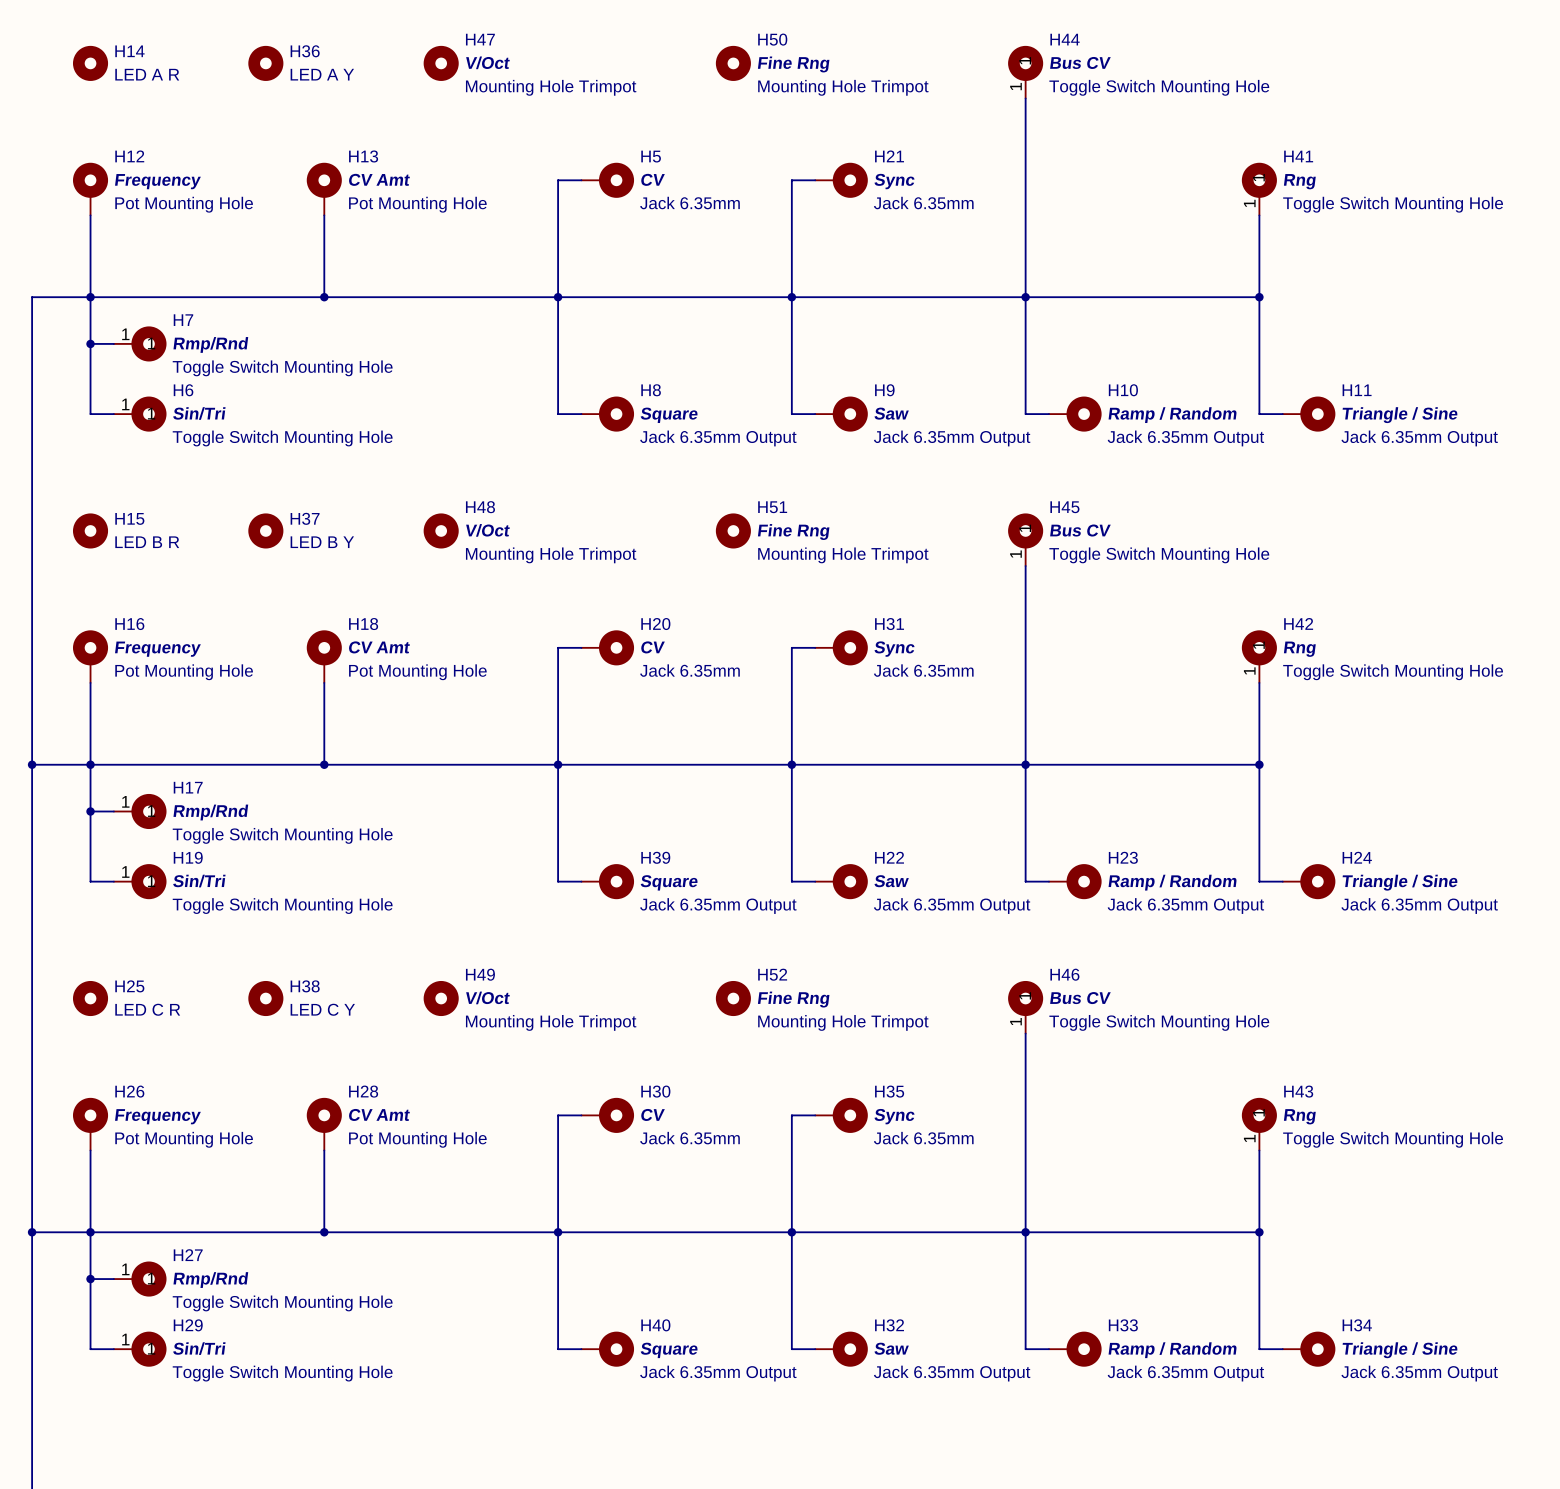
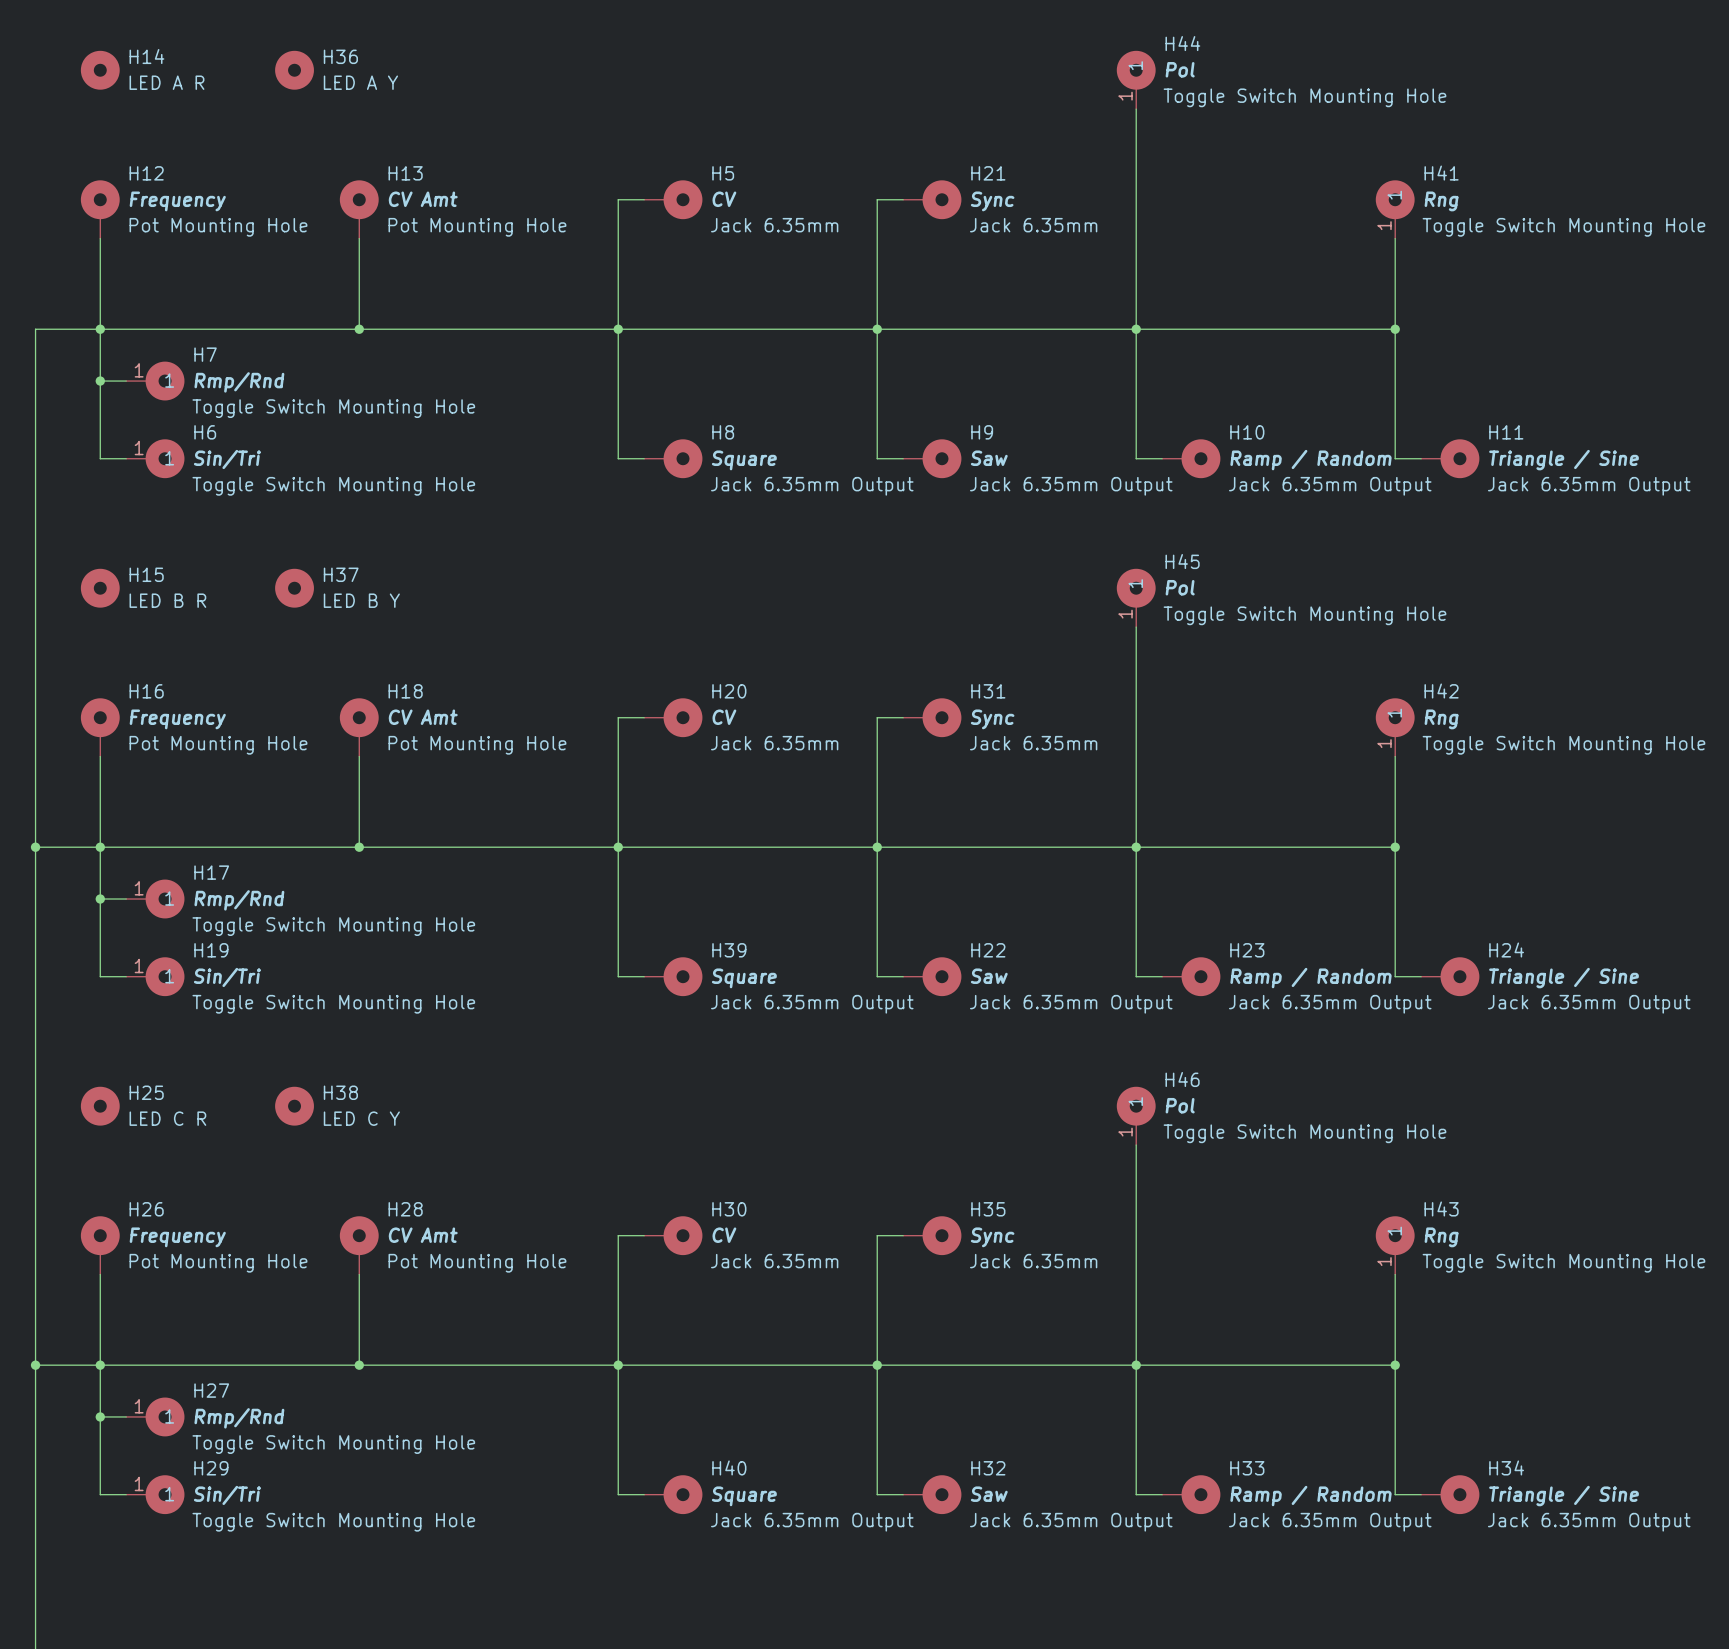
H44 value: Bus CV (1080, 62) -> Pol (1180, 69)
H47: V/Oct (441, 63) -> none
H50: Fine Rng (733, 63) -> none
H48: V/Oct (441, 530) -> none
H51: Fine Rng (733, 530) -> none
H45 value: Bus CV (1080, 530) -> Pol (1180, 587)
H49: V/Oct (441, 998) -> none
H52: Fine Rng (733, 998) -> none
H46 value: Bus CV (1080, 998) -> Pol (1180, 1105)

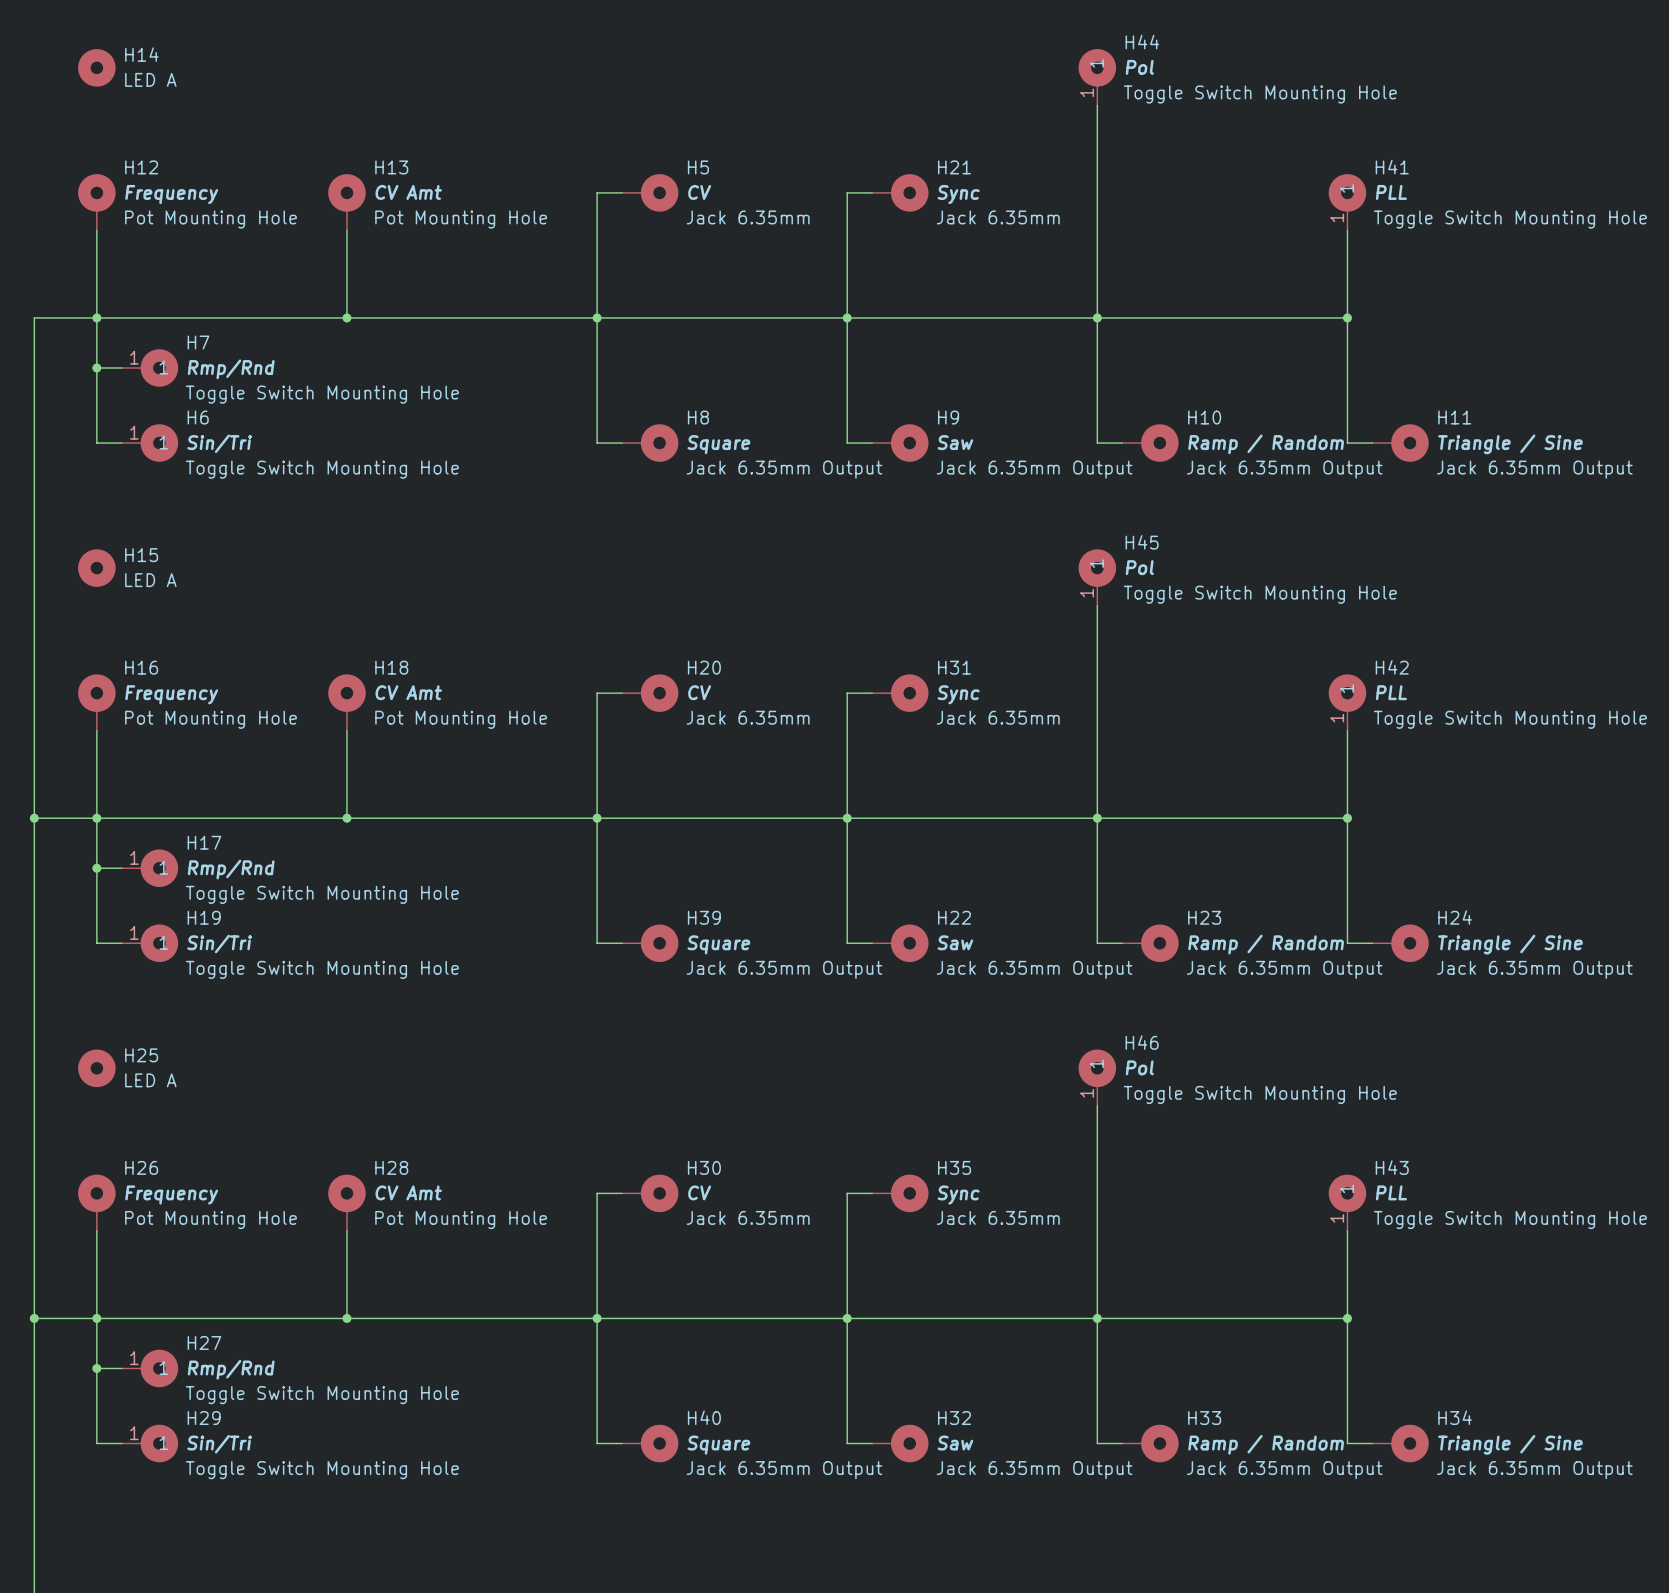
H36: LED A Y (294, 70) -> none
H14 value: LED A R (166, 82) -> LED A (150, 79)
H41 value: Rng (1441, 201) -> PLL (1391, 192)
H37: LED B Y (294, 588) -> none
H15 value: LED B R (167, 600) -> LED A (150, 580)
H42 value: Rng (1441, 719) -> PLL (1391, 692)
H38: LED C Y (294, 1106) -> none
H25 value: LED C R (167, 1118) -> LED A (150, 1080)
H43 value: Rng (1441, 1237) -> PLL (1391, 1192)

